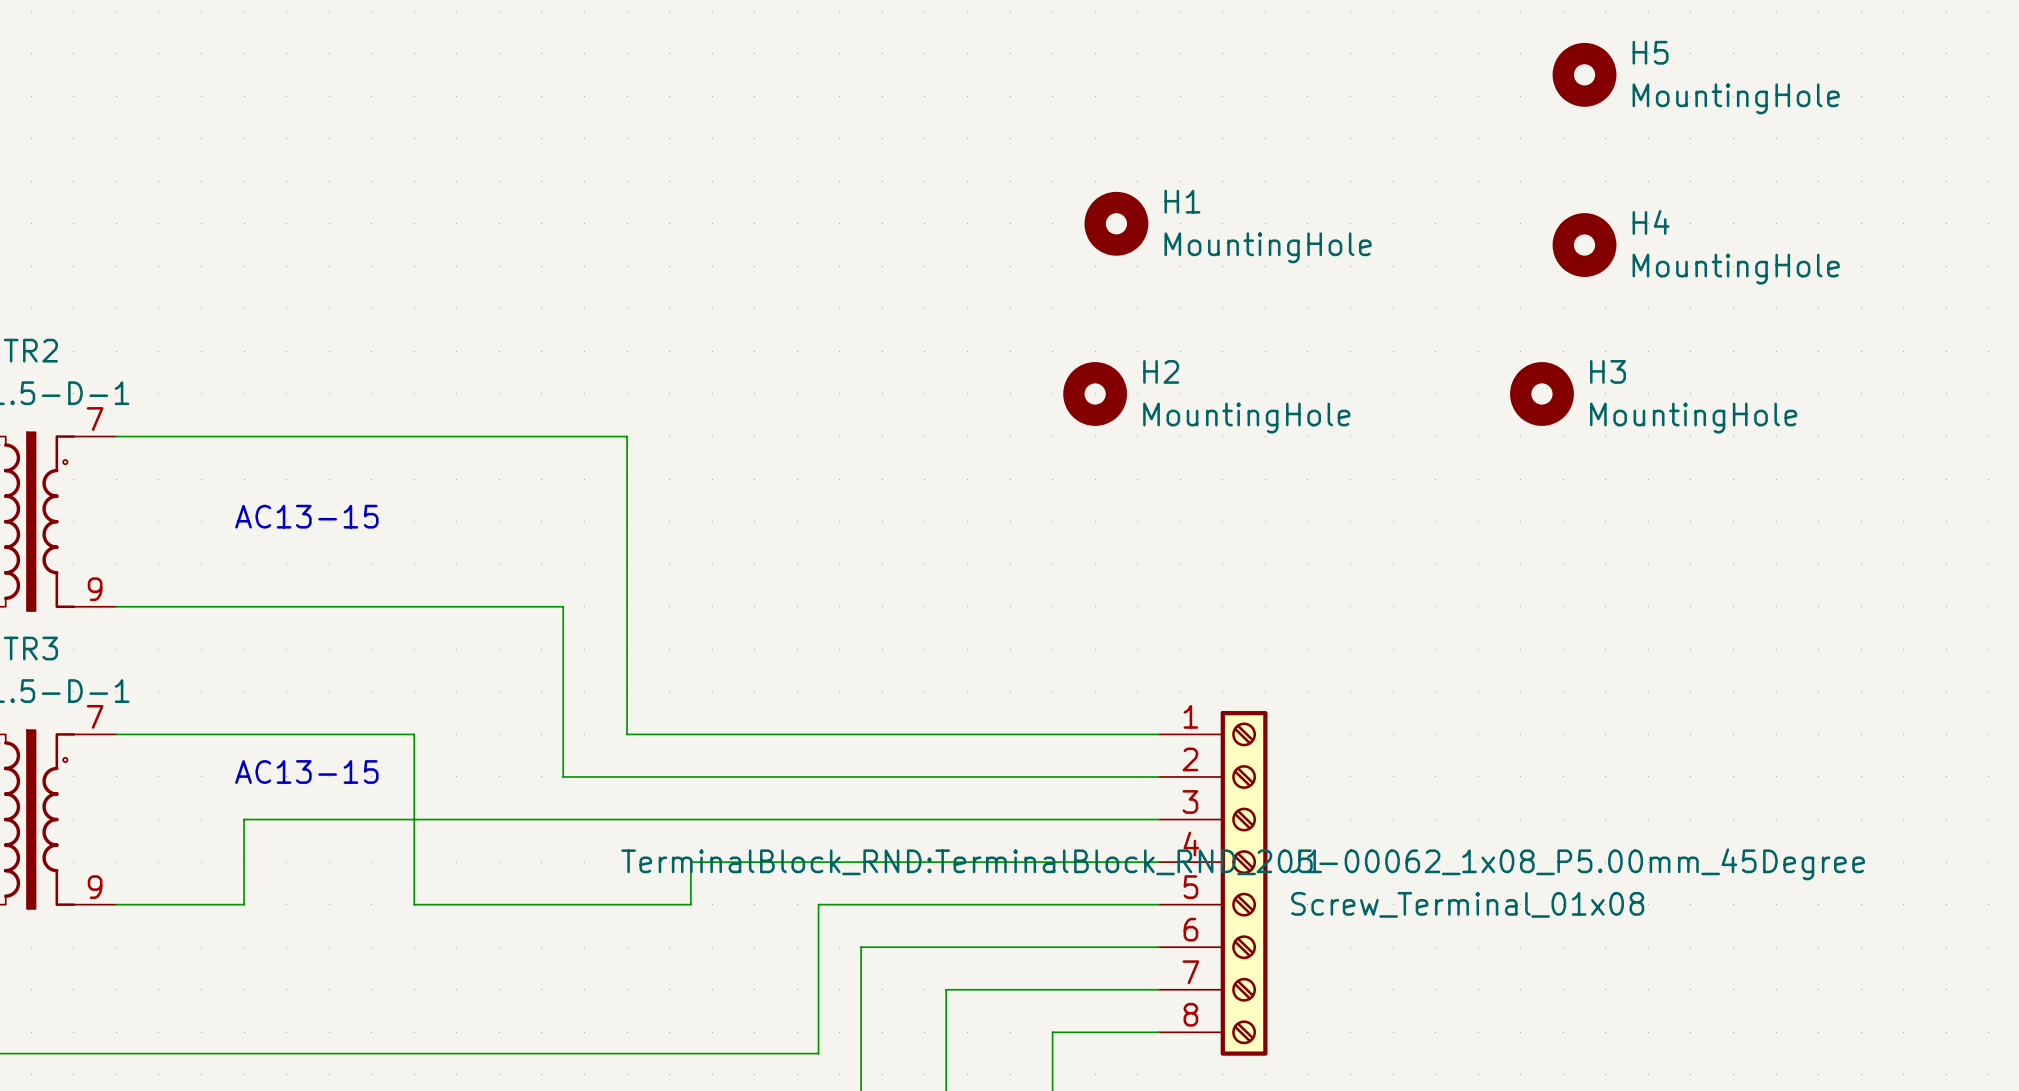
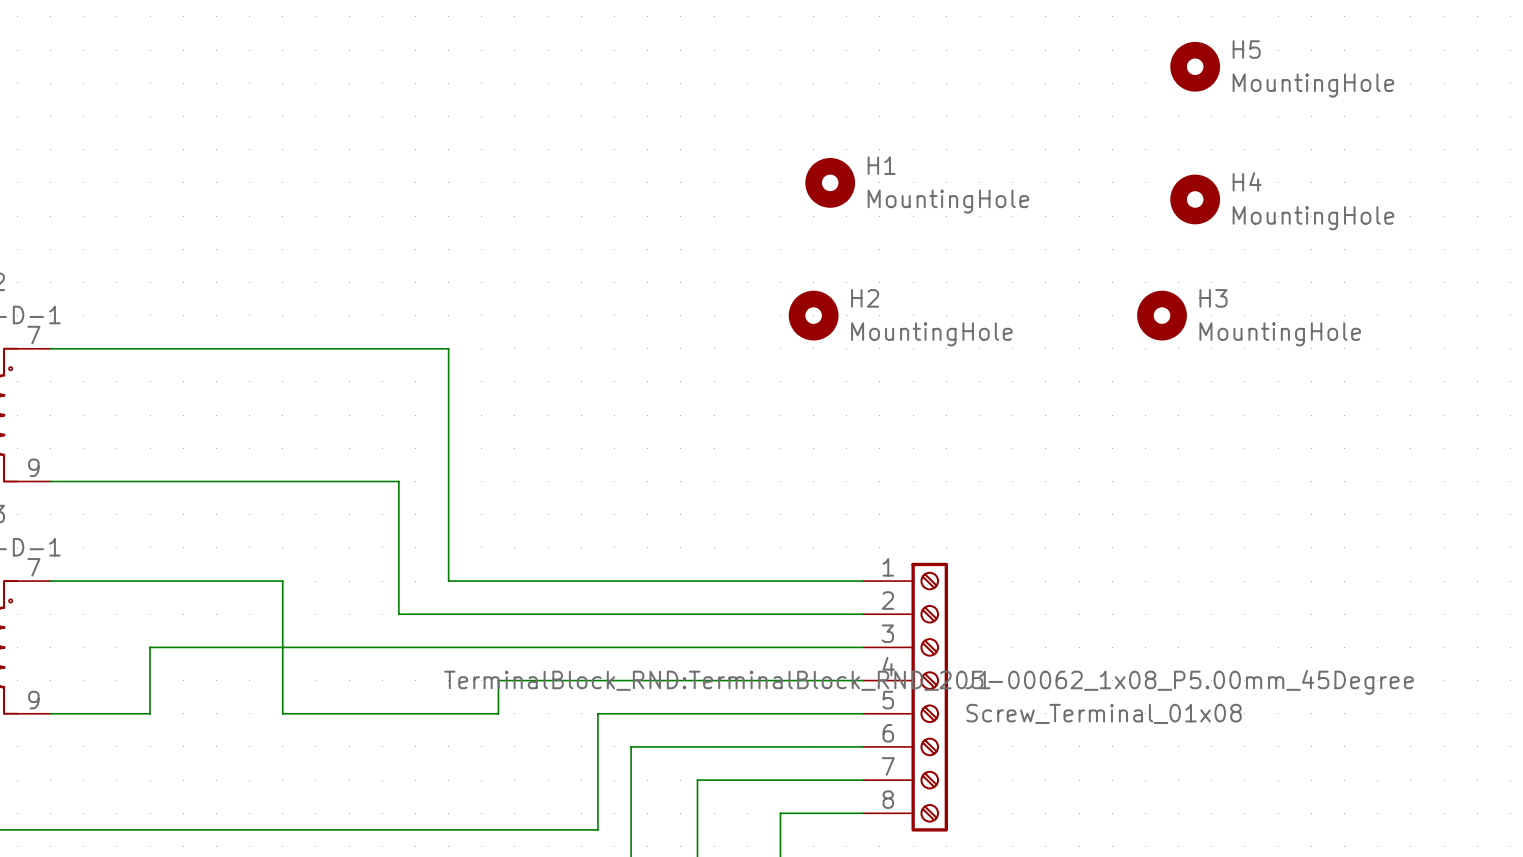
text: AC13-15 (306, 516) -> none
text: AC13-15 (306, 772) -> none

